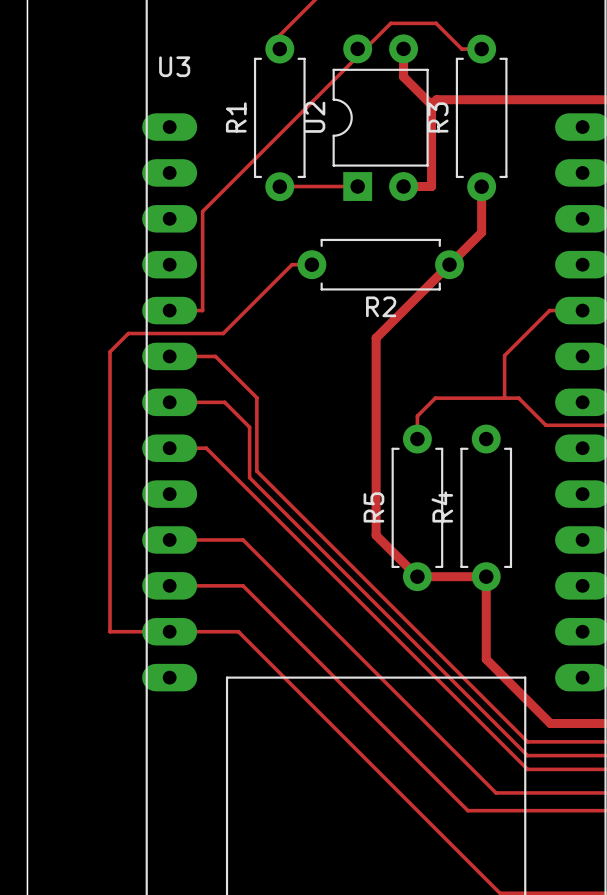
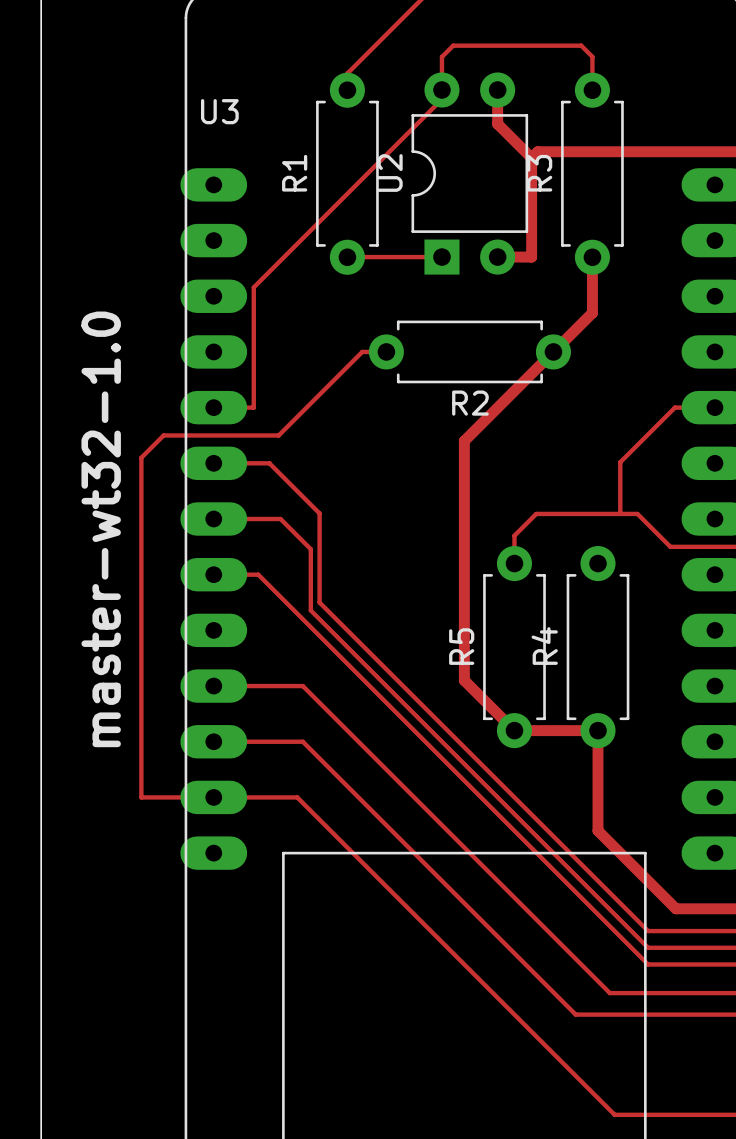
track: (365, 48) (390, 23) (436, 23) (461, 49) (481, 49) -> (441, 90) (441, 56) (453, 45) (581, 45) (592, 56) (592, 90)
text: none -> master-wt32-1.0 (101, 529)

